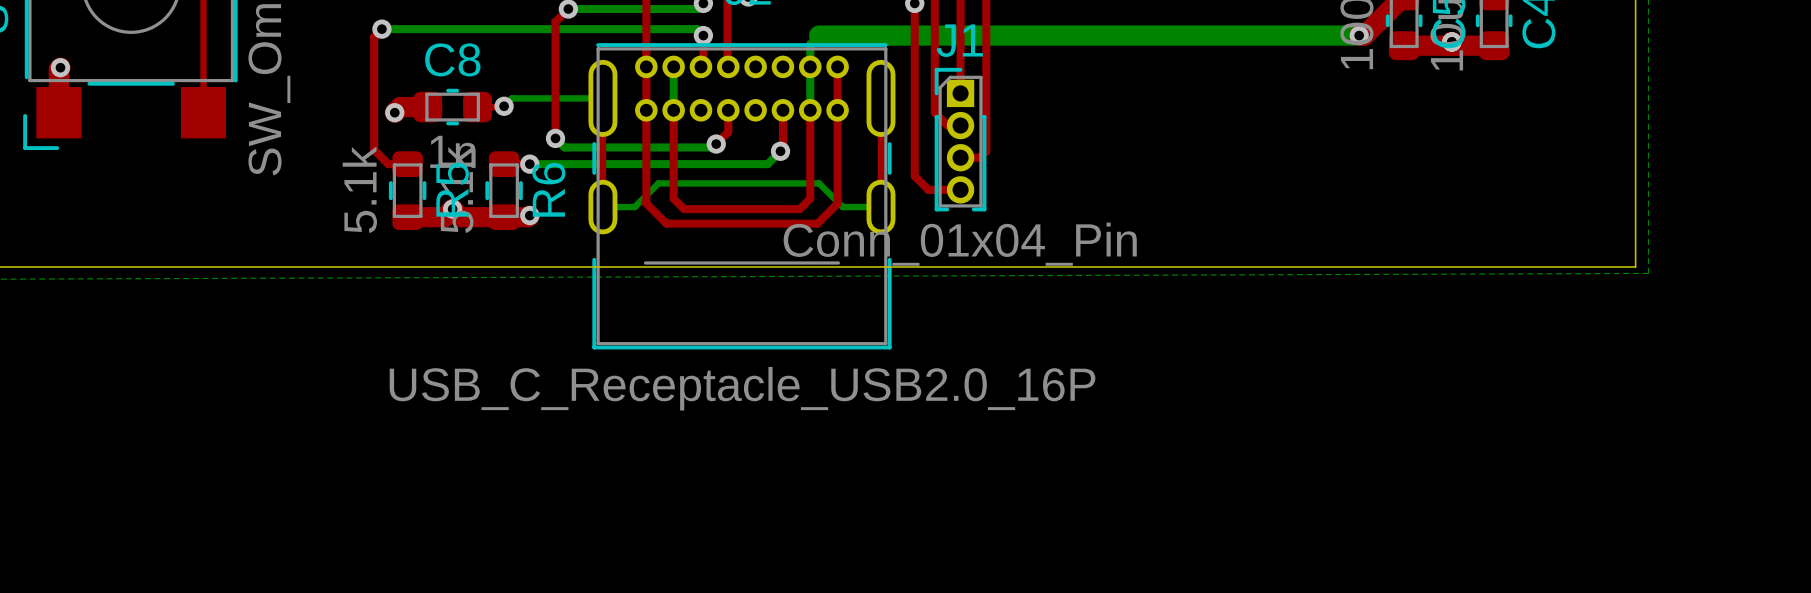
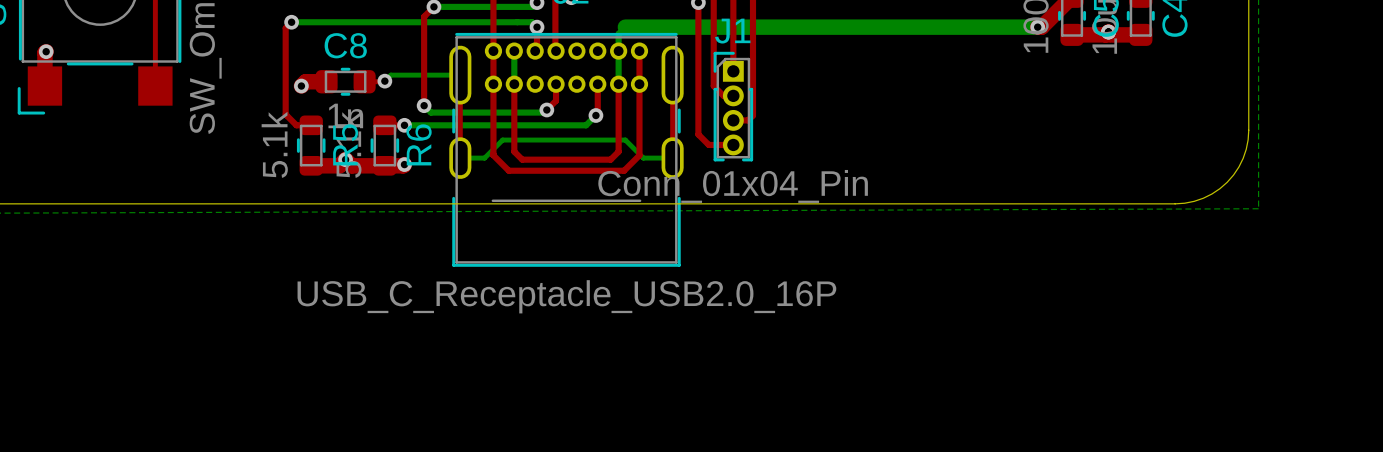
board edge: (1635, 170) (1635, 267) (1539, 267) -> (1248, 130) (1243, 158) (1227, 182) (1203, 198) (1175, 203)

